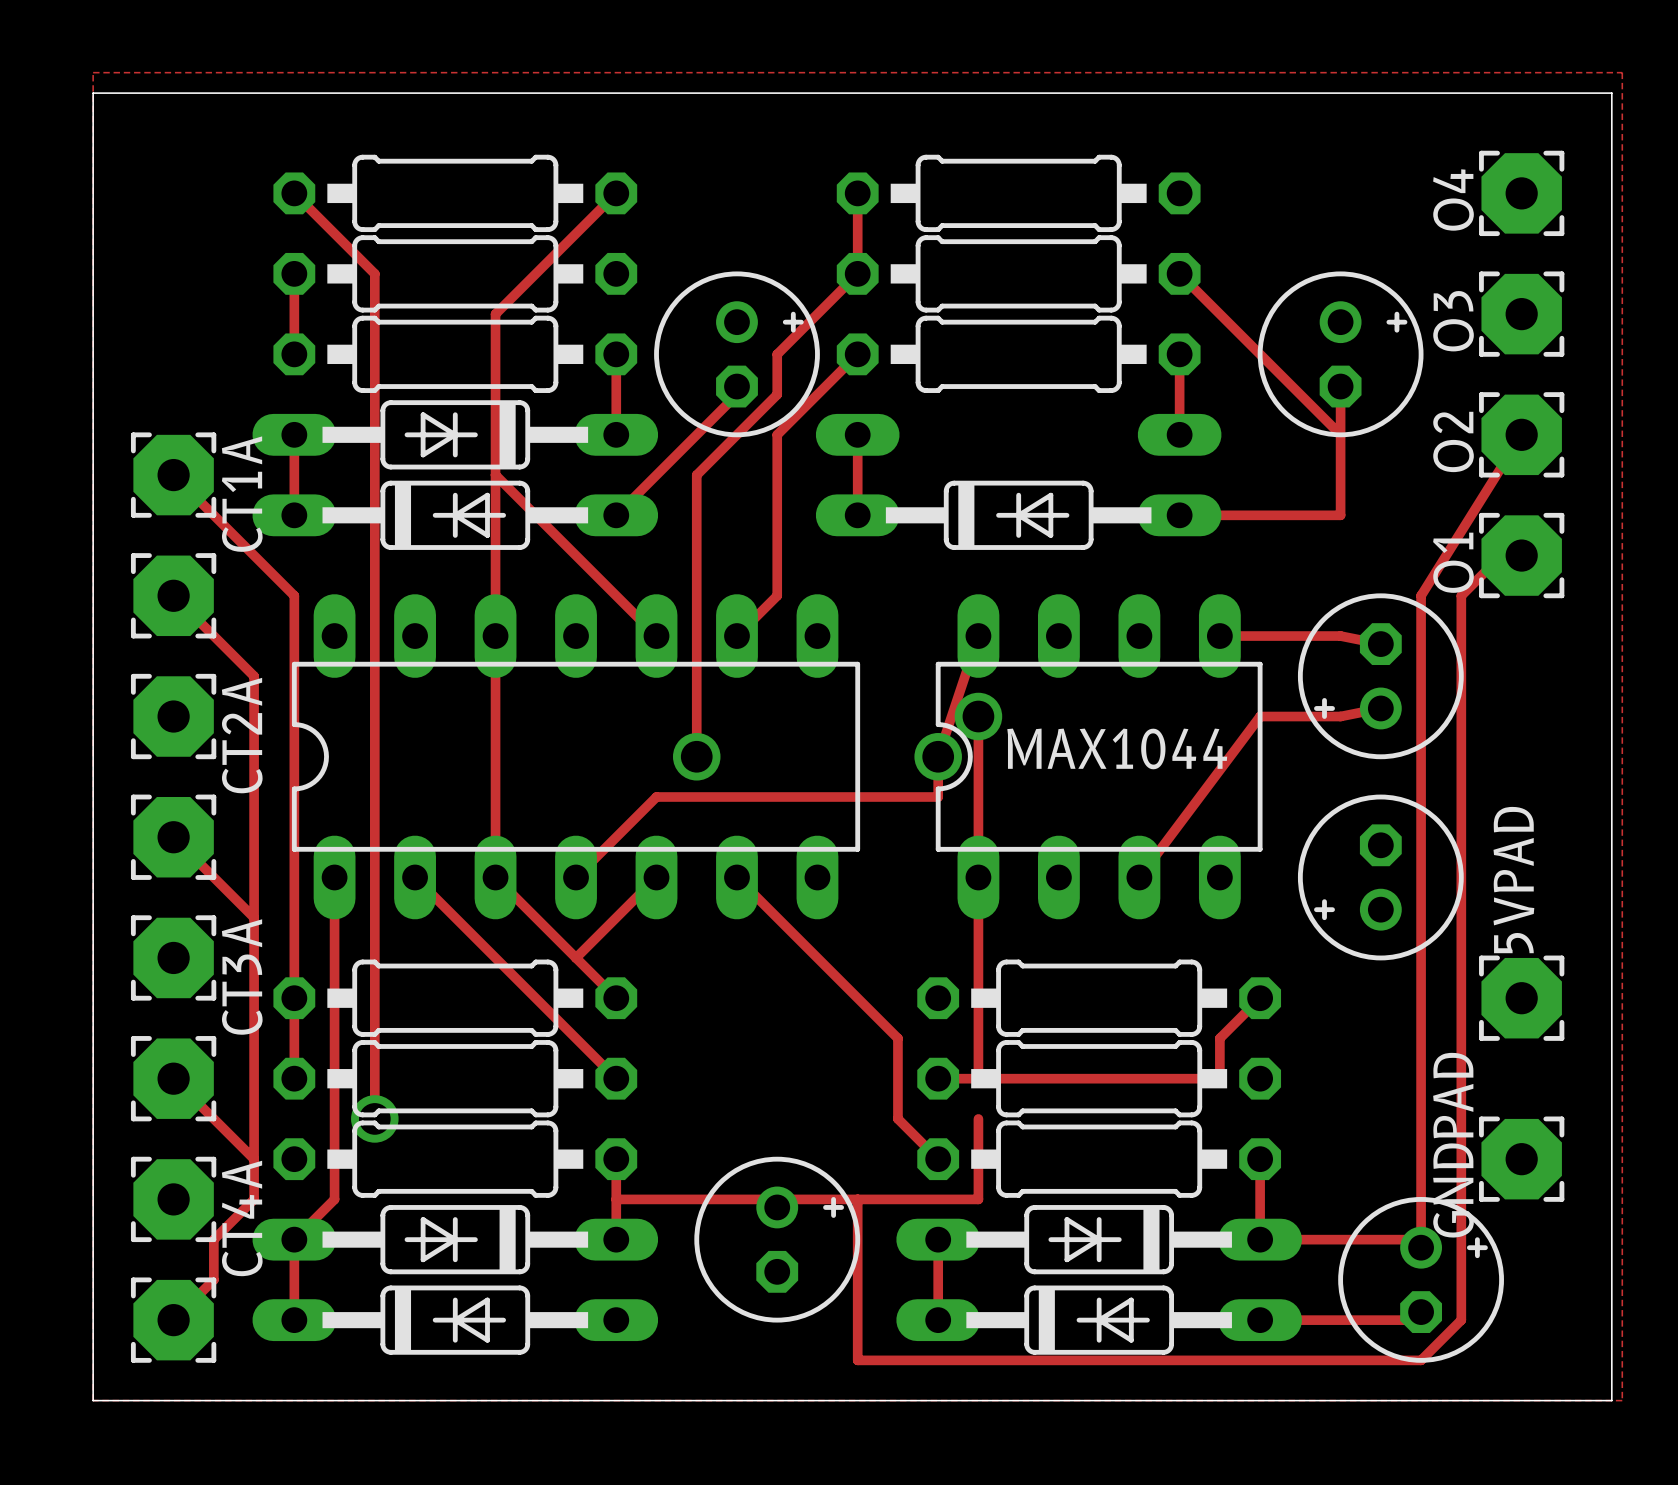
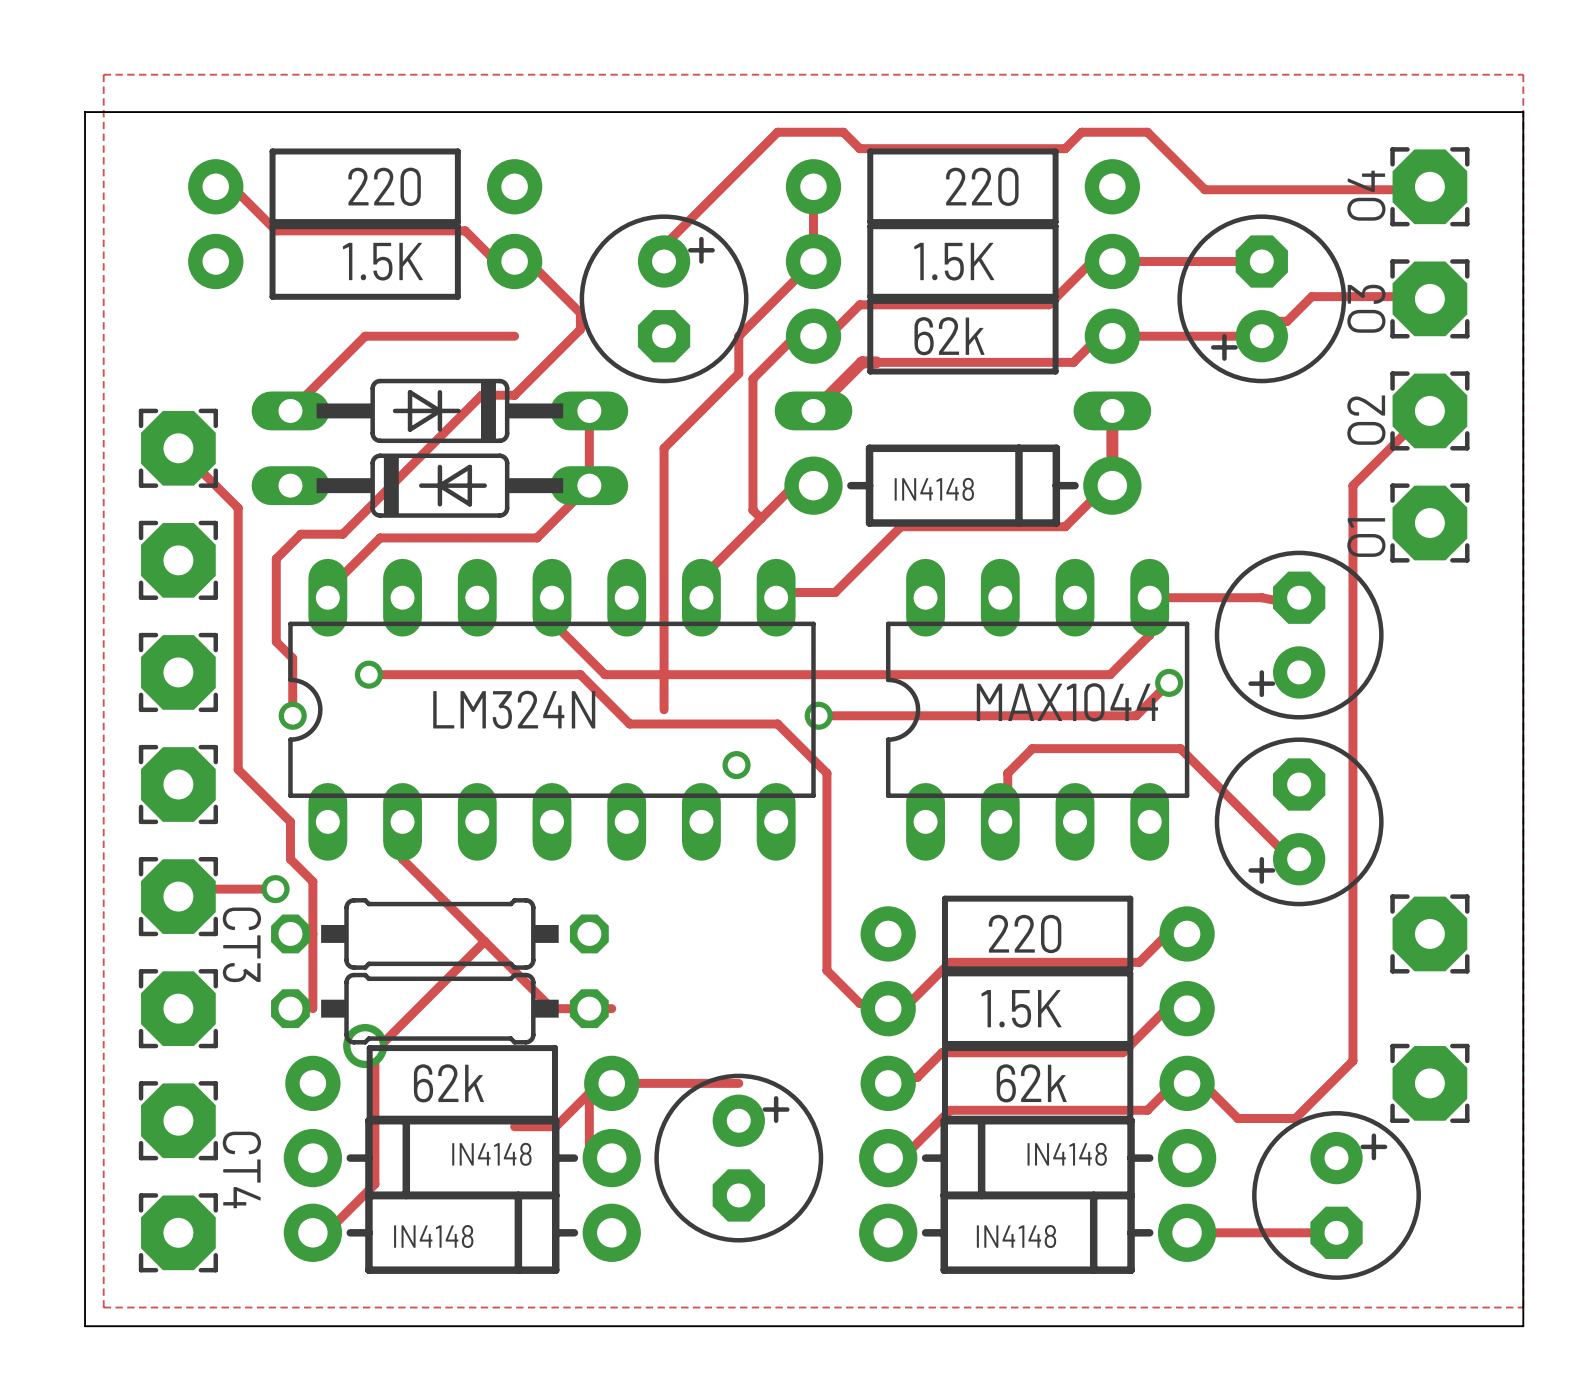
board edge: (93, 93) (1611, 93) (1611, 1400) (93, 1400) (93, 93) -> (85, 112) (85, 1326) (1523, 1326) (1523, 112) (85, 112)
part footprint: [836, 154, 1201, 233] -> [785, 148, 1141, 226]
track: none -> (215, 186) (218, 189) (235, 189) (276, 230) (465, 230) (489, 255) (514, 255) (514, 263) (531, 263) (580, 313) (580, 329) (514, 395) (481, 395) (342, 534) (300, 534) (276, 558) (276, 641) (292, 658) (292, 715)
track: (294, 193) (374, 273) (374, 1118) -> none
part: none -> 220 (365, 186)
part: (455, 193) -> none
track: (616, 193) (495, 314) (495, 877) (616, 998) -> none
part value: none -> 220 (982, 186)
track: none -> (1429, 186) (1426, 189) (1205, 189) (1147, 132) (1081, 132) (1065, 148) (859, 148) (843, 132) (777, 132) (662, 247) (662, 263) (664, 261)
part footprint: [836, 235, 1201, 313] -> [785, 223, 1141, 300]
track: (294, 273) (294, 354) -> none
part: none -> 1.5K (365, 261)
part: (455, 273) -> none
track: (1179, 273) (1340, 434) -> none
track: none -> (1261, 261) (1112, 261) (1106, 263) (1089, 263) (1048, 304) (859, 304) (835, 329) (818, 329) (810, 337) (794, 337) (752, 378) (752, 510) (761, 518)
part value: none -> 1.5K (954, 261)
part: none -> (664, 298)
part: none -> (1261, 298)
part footprint: [836, 315, 1201, 393] -> [785, 297, 1141, 375]
part value: none -> 62k (949, 336)
part: (455, 354) -> none
track: (616, 354) (616, 434) -> (327, 597) (327, 590) (380, 537) (537, 537) (589, 485) (589, 410)
part: (736, 354) -> none
track: (857, 354) (777, 434) (777, 595) (736, 636) -> (813, 485) (794, 485) (703, 576) (703, 592) (701, 597)
track: (1179, 354) (1179, 434) -> (776, 597) (777, 592) (835, 592) (900, 526) (1065, 526) (1106, 485) (1112, 485) (1112, 410)
part: (1340, 354) -> none
track: (736, 386) (736, 394) (616, 515) -> none
track: (1340, 386) (1340, 515) (1182, 515) -> none
track: (294, 434) (294, 515) -> (290, 410) (365, 336) (514, 336)
track: (857, 434) (857, 515) -> (813, 410) (862, 362) (1073, 362) (1106, 329) (1112, 336) (1261, 336) (1262, 321) (1287, 321) (1311, 296) (1426, 296) (1429, 298)
track: (1521, 434) (1421, 595) (1421, 1239) (1260, 1239) (1260, 1159) -> (1429, 410) (1426, 411) (1352, 485) (1352, 1060) (1295, 1118) (1237, 1118) (1205, 1085) (1188, 1085) (1180, 1077) (1147, 1110) (950, 1110) (909, 1151) (892, 1151) (888, 1158)
track: (495, 475) (656, 636) -> none
part footprint: [815, 480, 1222, 550] -> [784, 444, 1142, 527]
CT1A name: CT1A (242, 494) -> none
part value: none -> IN4148 (934, 489)
track: (238, 539) (294, 595) (294, 877) -> (238, 508) (238, 769) (290, 821)
track: (1521, 555) (1501, 555) (1461, 595) (1461, 1320) (1421, 1360) (857, 1360) (857, 1199) -> none
part footprint: [1297, 593, 1464, 760] -> [1214, 550, 1384, 720]
track: (173, 595) (254, 676) (254, 1199) (213, 1239) (213, 1279) (173, 1320) -> none
track: none -> (551, 597) (555, 600) (555, 625) (605, 674) (1110, 674) (1149, 635) (1149, 597) (1147, 600)
track: (978, 636) (938, 756) (938, 797) (656, 797) (576, 877) -> none
track: (1380, 708) (1340, 716) (1260, 716) (1139, 877) -> none
track: (978, 716) (978, 1078) -> none
via: (978, 716) -> none
via: none -> (368, 674)
track: none -> (1169, 682) (1136, 715) (818, 715)
via: none -> (1169, 682)
CT2A name: CT2A (242, 735) -> none
part value: none -> LM324N (514, 709)
via: (696, 756) -> none
via: (938, 756) -> none
via: none -> (292, 715)
via: none -> (818, 715)
part footprint: [1297, 794, 1464, 961] -> [1214, 737, 1384, 907]
via: none -> (736, 765)
track: (173, 837) (254, 917) -> none
track: (334, 877) (334, 1199) (294, 1239) (294, 1320) -> none
track: (415, 877) (616, 1078) -> (402, 821) (402, 859) (551, 1008) (611, 1008)
track: (656, 877) (576, 957) -> none
track: (736, 877) (897, 1038) (897, 1118) (938, 1159) -> (1187, 1008) (1180, 1011) (1163, 1011) (1122, 1052) (942, 1052) (917, 1077) (892, 1077) (888, 1083)
track: none -> (1000, 821) (1007, 814) (1007, 773) (1032, 748) (1180, 748) (1278, 847) (1295, 847) (1299, 859)
5VPAD name: 5VPAD (1513, 880) -> none
track: (294, 917) (294, 1078) -> (290, 859) (312, 881) (312, 1008)
track: none -> (275, 889) (185, 889) (178, 896)
via: none -> (275, 889)
part footprint: [917, 959, 1282, 1037] -> [860, 895, 1215, 973]
CT3A name: CT3A (242, 977) -> none
part value: none -> 220 (1025, 933)
track: (1260, 998) (1219, 1038) (1219, 1078) (938, 1078) -> (1187, 933) (1180, 937) (1163, 937) (1139, 962) (950, 962) (909, 1003) (892, 1003) (888, 1008) (884, 1003) (859, 1003) (826, 970) (826, 773) (777, 723) (629, 723) (580, 674) (368, 674)
track: none -> (484, 941) (374, 1051) (374, 1184) (333, 1225) (317, 1225) (312, 1232)
text: none -> CT3 (241, 944)
part footprint: [917, 1040, 1282, 1118] -> [860, 970, 1215, 1047]
track: (173, 1078) (254, 1159) -> none
part value: none -> 1.5K (1021, 1008)
track: (978, 1118) (978, 1199) (616, 1199) -> none
part footprint: [273, 1120, 638, 1198] -> [285, 1045, 640, 1122]
part footprint: [917, 1120, 1282, 1198] -> [860, 1045, 1215, 1122]
GNDPAD name: GNDPAD (1453, 1145) -> none
part footprint: [694, 1156, 861, 1323] -> [654, 1073, 824, 1243]
part value: none -> 62k (448, 1083)
part value: none -> 62k (1031, 1083)
track: none -> (738, 1083) (611, 1083) (605, 1077) (555, 1126) (514, 1126)
part footprint: [1338, 1196, 1504, 1363] -> [1252, 1111, 1421, 1280]
part footprint: [252, 1205, 659, 1275] -> [283, 1117, 641, 1200]
part footprint: [896, 1205, 1302, 1275] -> [859, 1117, 1217, 1200]
CT4A name: CT4A (242, 1218) -> none
part value: none -> IN4148 (491, 1154)
part value: none -> IN4148 (1067, 1154)
track: (938, 1239) (938, 1320) -> none
text: none -> CT4 (241, 1169)
part footprint: [252, 1285, 659, 1355] -> [283, 1191, 641, 1274]
part footprint: [896, 1285, 1302, 1355] -> [859, 1191, 1217, 1274]
part value: none -> IN4148 (433, 1236)
part value: none -> IN4148 (1016, 1236)

